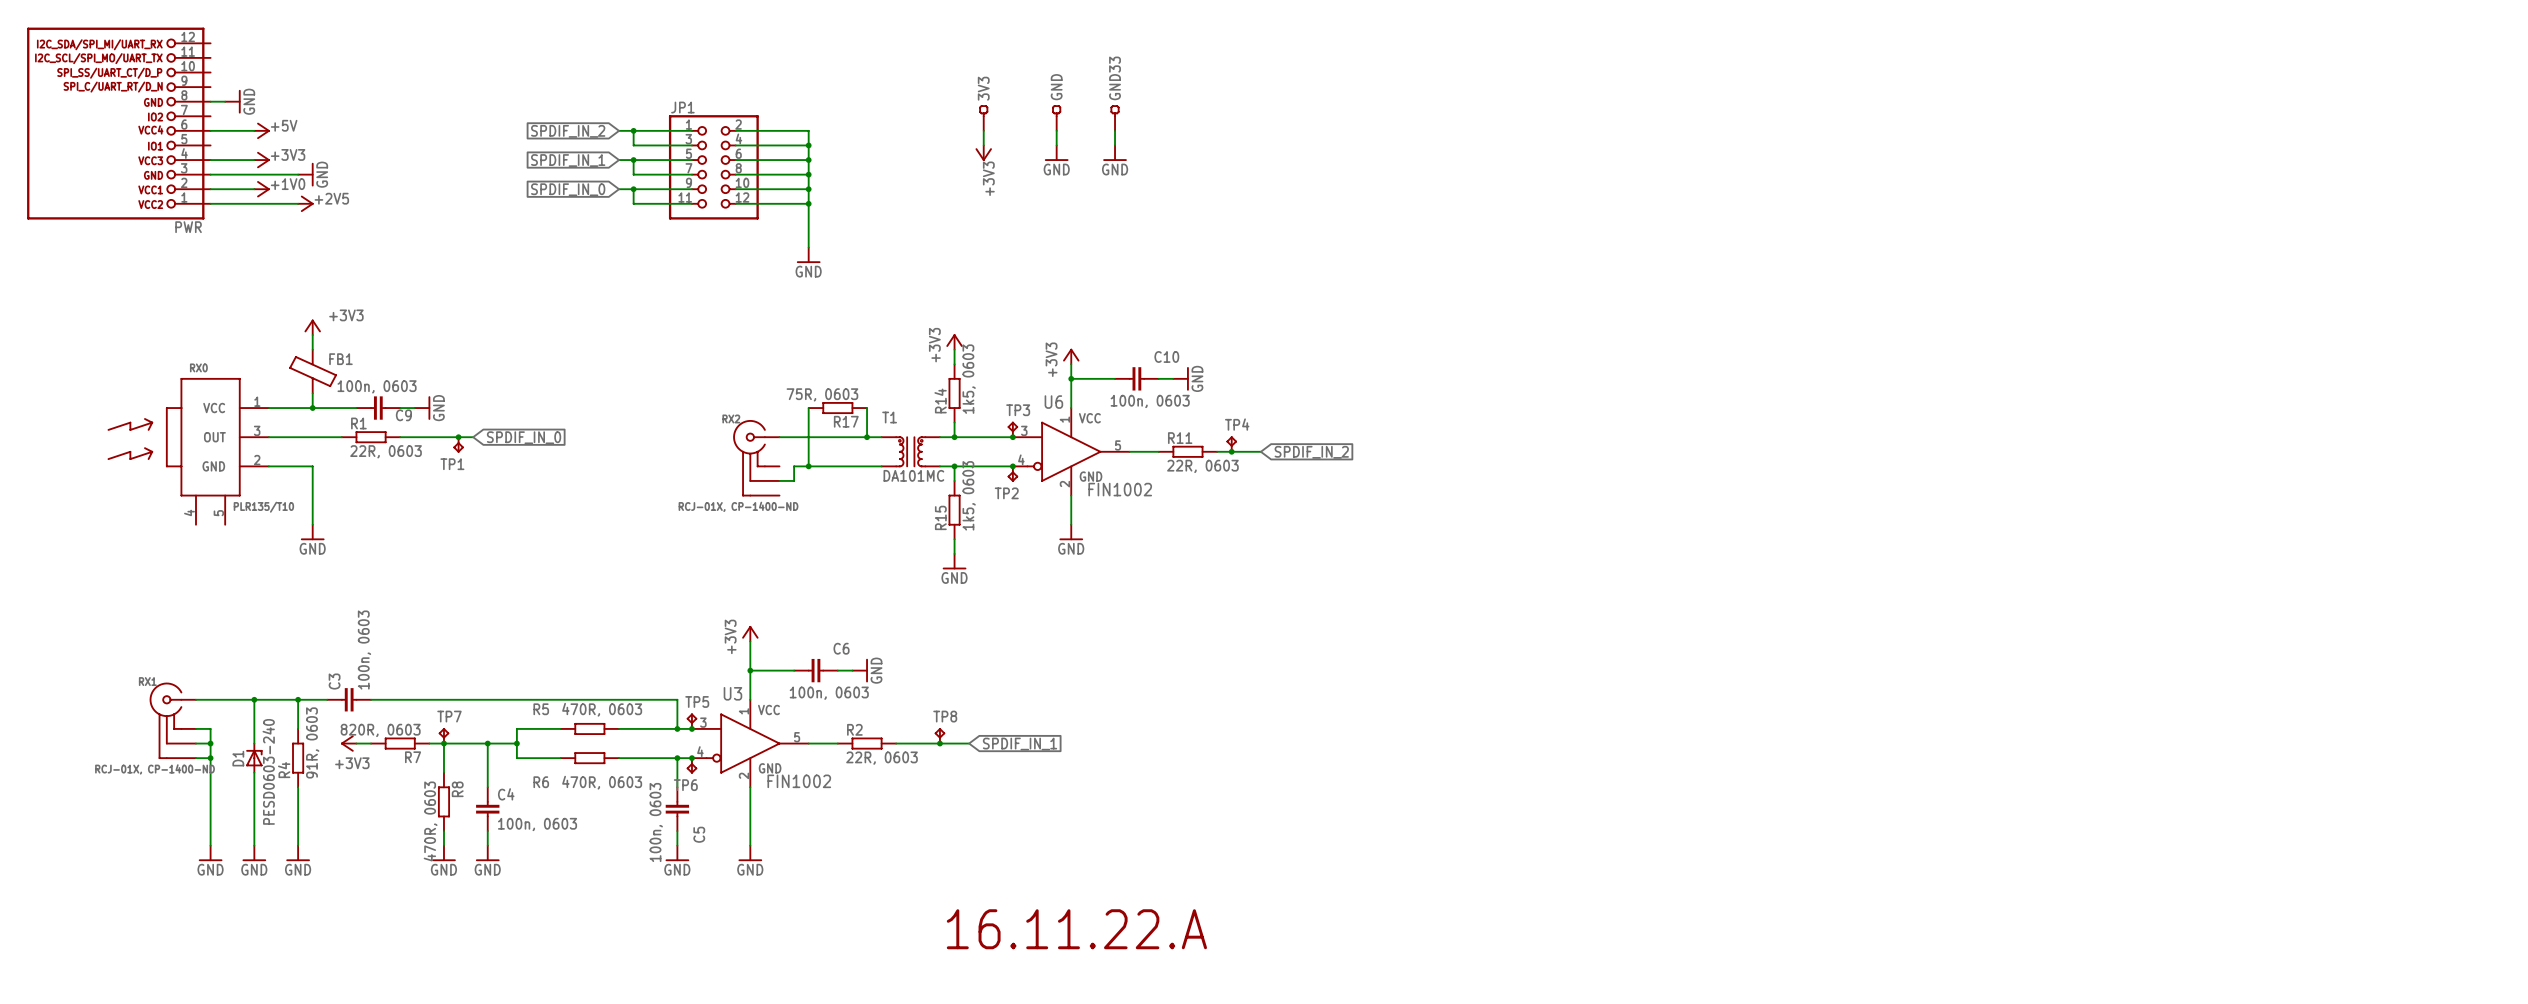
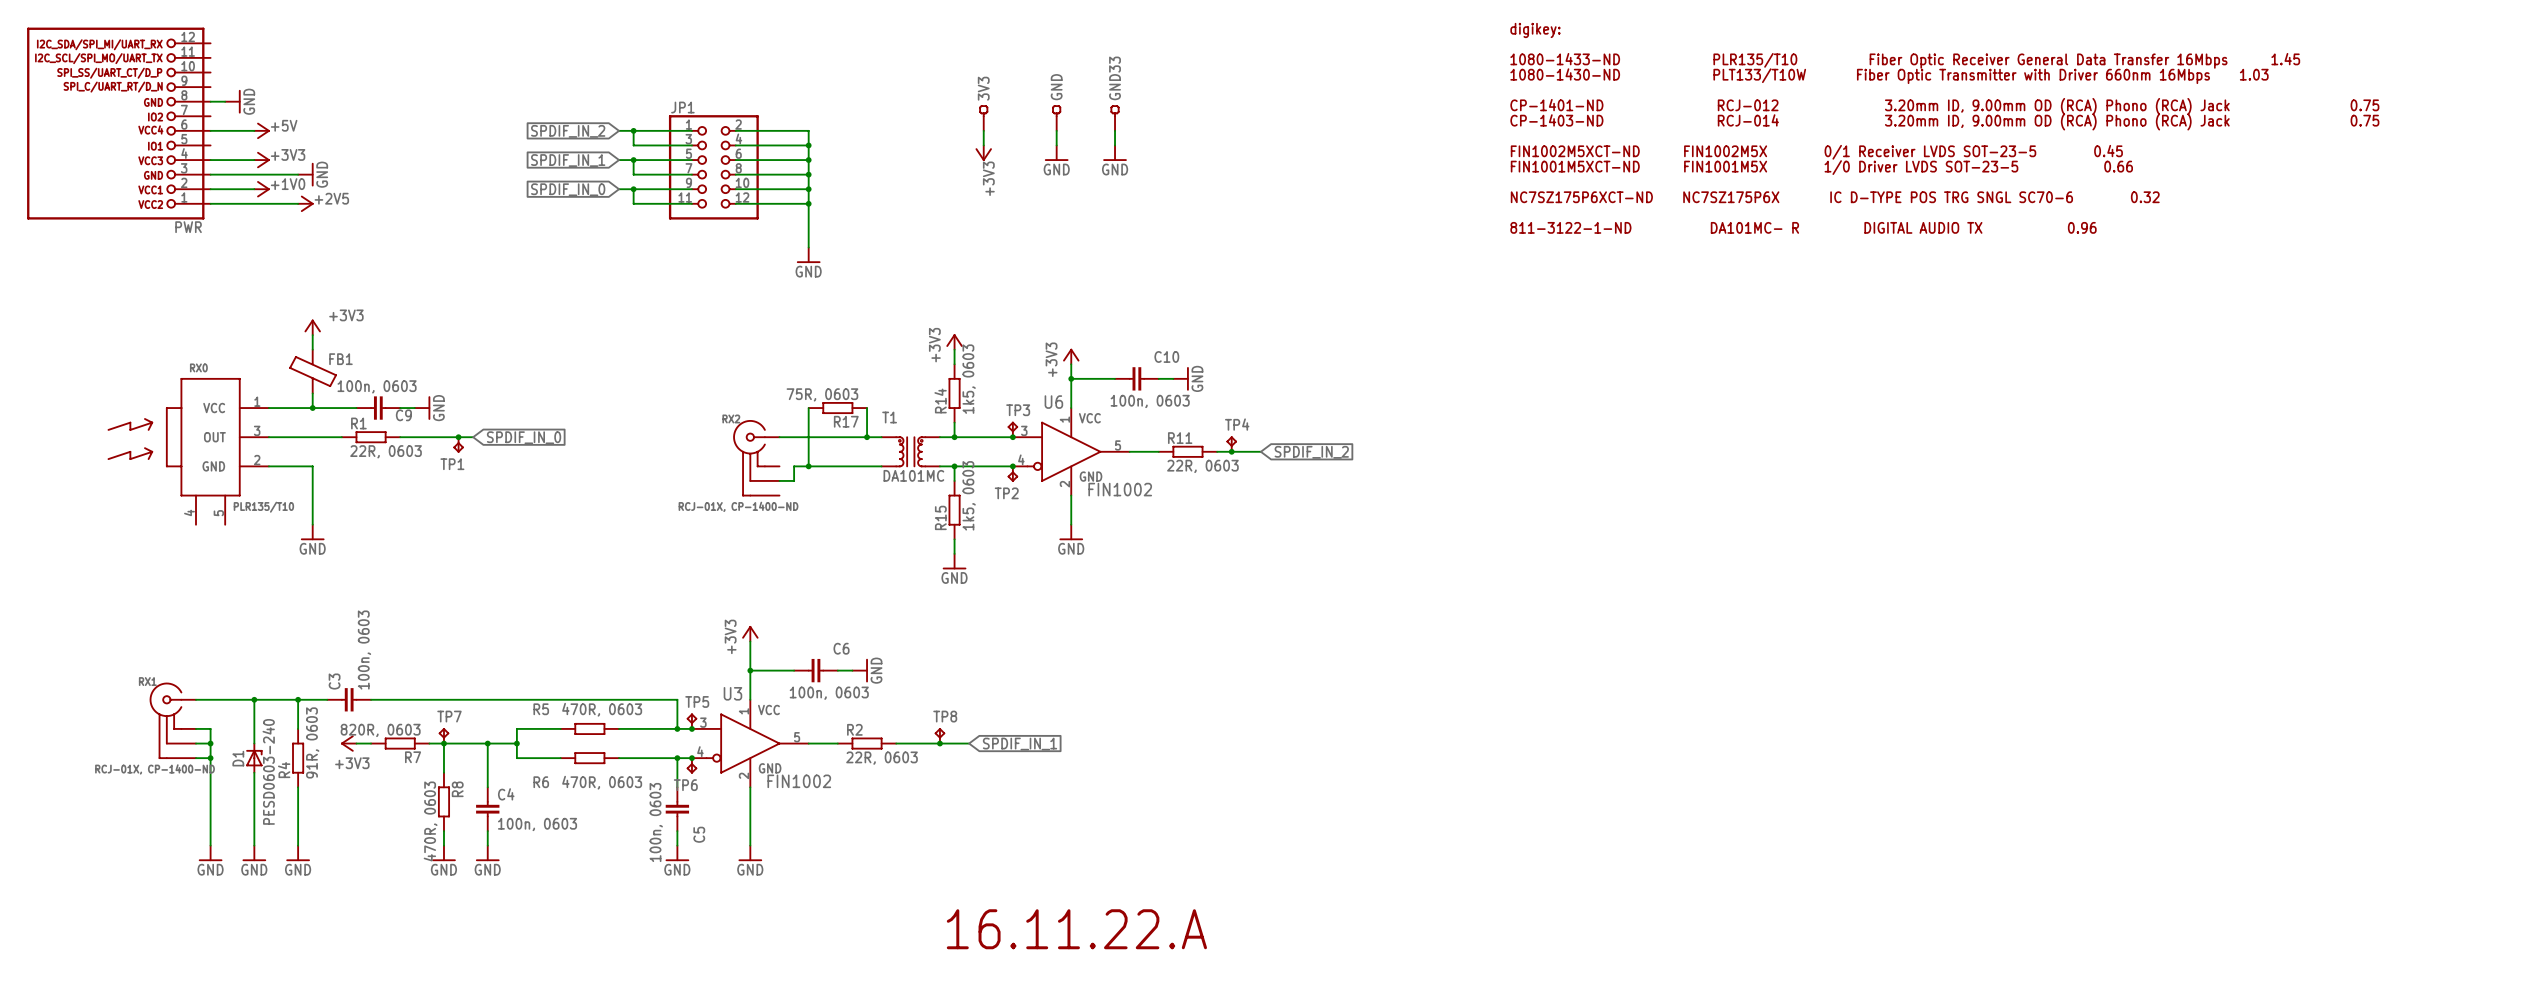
text: none -> digikey: (1535, 30)
text: none -> 1080-1433-ND PLR135/T10 Fiber Optic Receiver General Data Transfer 16Mbps 1.45 (1905, 60)
text: none -> 1080-1430-ND PLT133/T10W Fiber Optic Transmitter with Driver 660nm 16Mbps 1.03 (1889, 76)
text: none -> CP-1401-ND RCJ-012 3.20mm ID, 9.00mm OD (RCA) Phono (RCA) Jack 0.75 (1944, 106)
text: none -> CP-1403-ND RCJ-014 3.20mm ID, 9.00mm OD (RCA) Phono (RCA) Jack 0.75 (1944, 121)
text: none -> FIN1002M5XCT-ND FIN1002M5X 0/1 Receiver LVDS SOT-23-5 0.45 (1816, 152)
text: none -> FIN1001M5XCT-ND FIN1001M5X 1/0 Driver LVDS SOT-23-5 0.66 (1821, 167)
text: none -> NC7SZ175P6XCT-ND NC7SZ175P6X IC D-TYPE POS TRG SNGL SC70-6 0.32 (1835, 197)
text: none -> 811-3122-1-ND DA101MC- R DIGITAL AUDIO TX 0.96 (1803, 227)

